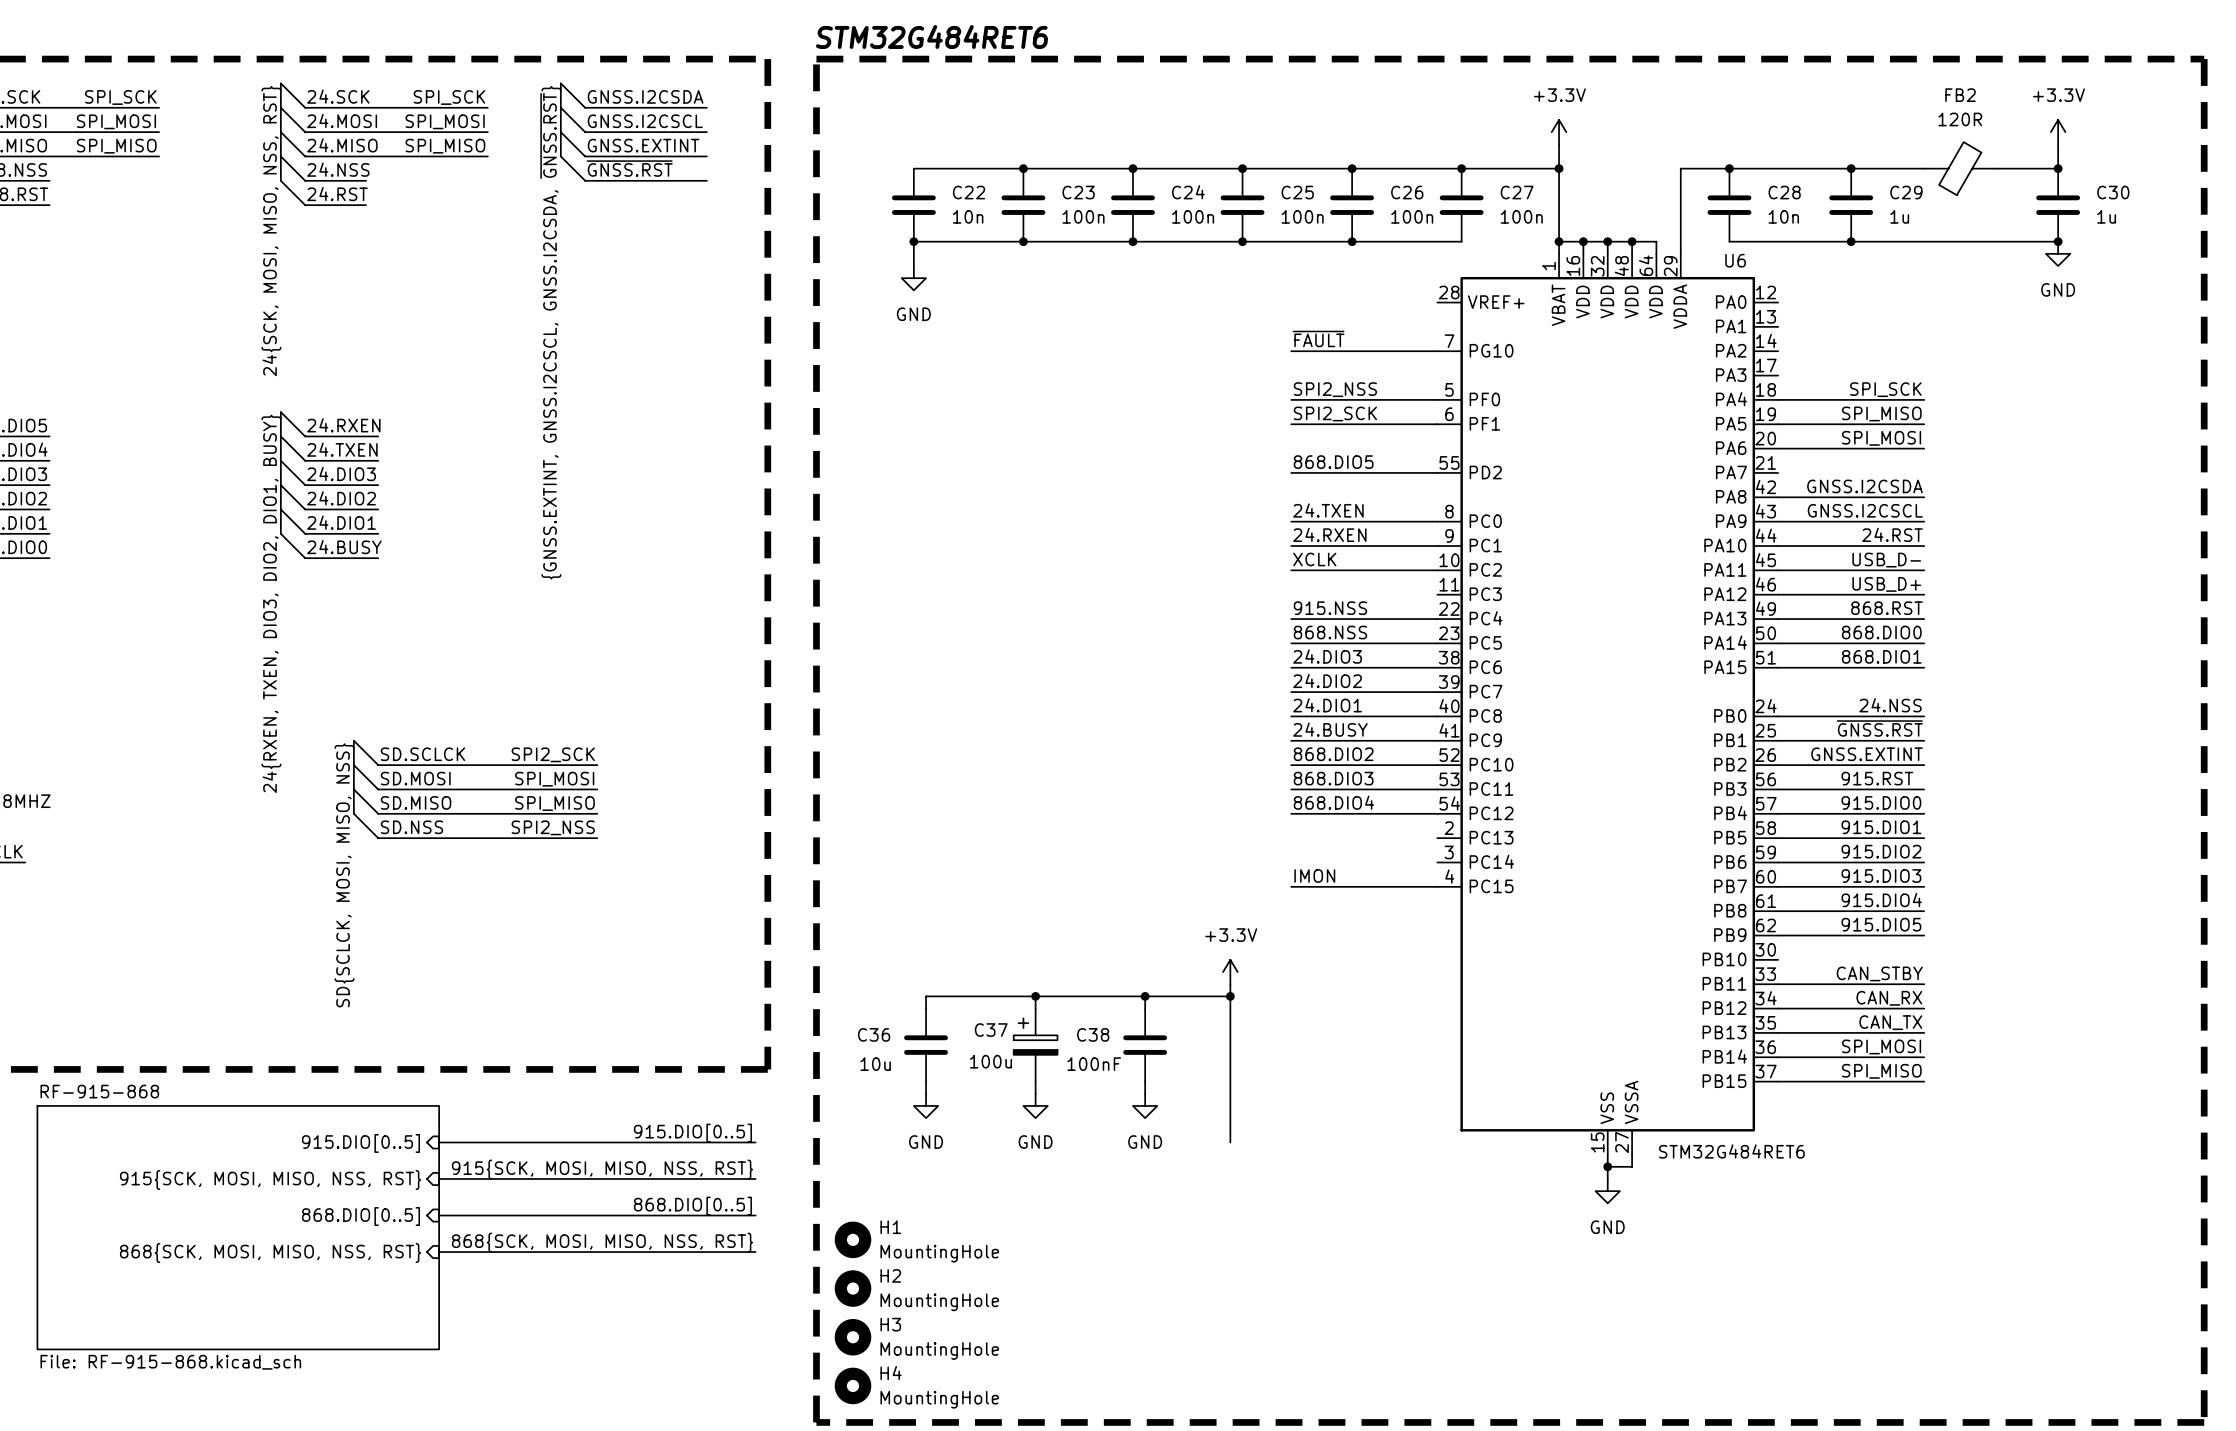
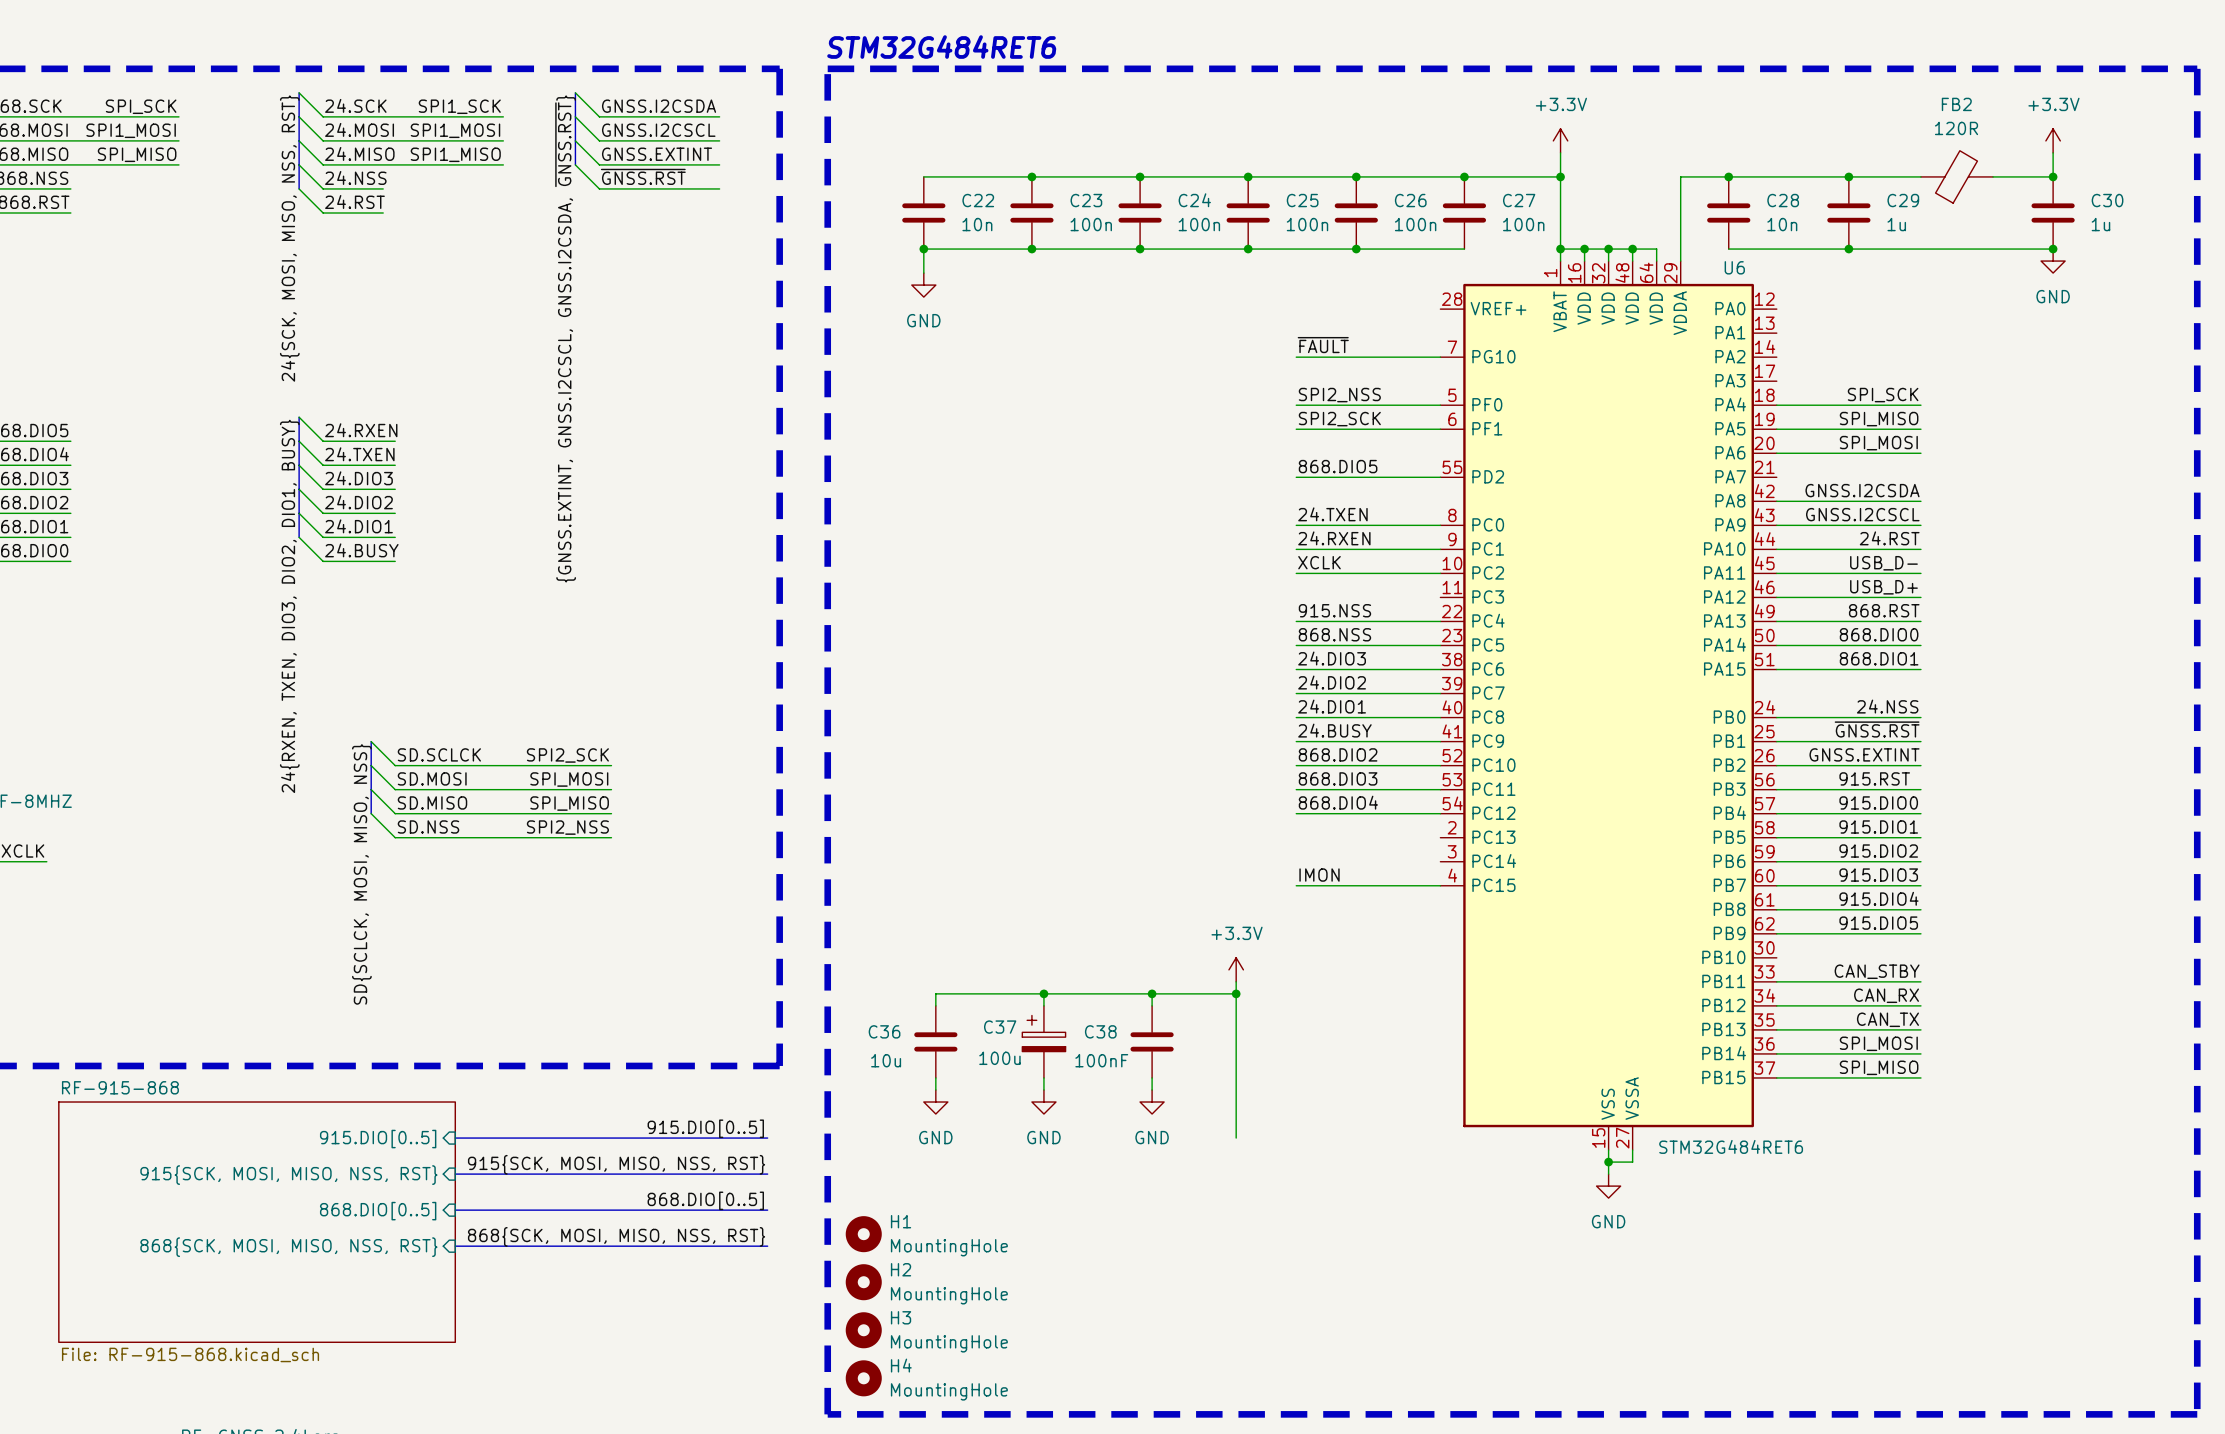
label: SPI_SCK (449, 97) -> SPI1_SCK (459, 106)
label: SPI_MOSI (116, 121) -> SPI1_MOSI (131, 130)
label: SPI_MOSI (445, 121) -> SPI1_MOSI (455, 130)
label: SPI_MISO (445, 146) -> SPI1_MISO (455, 154)

